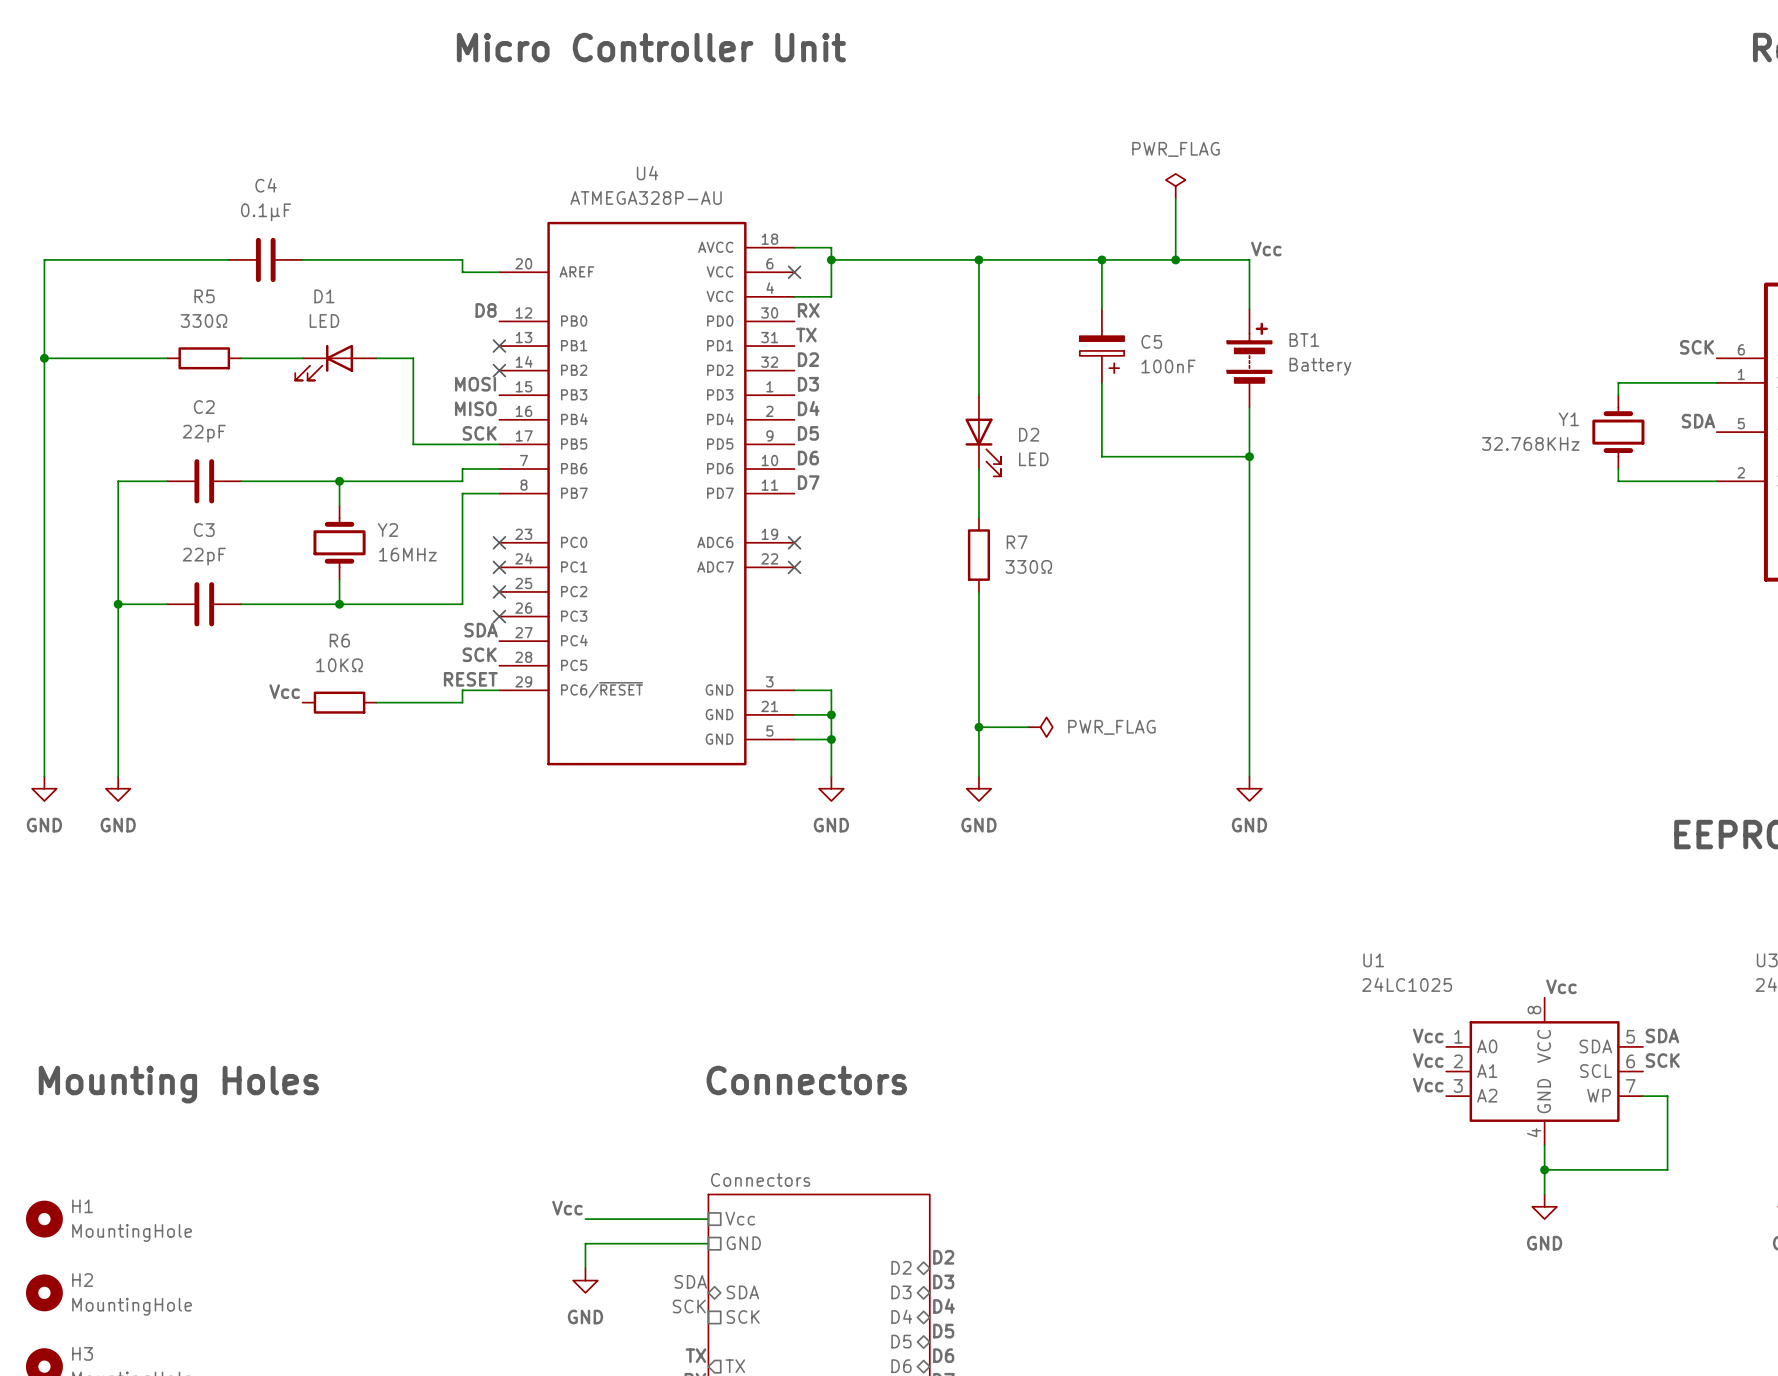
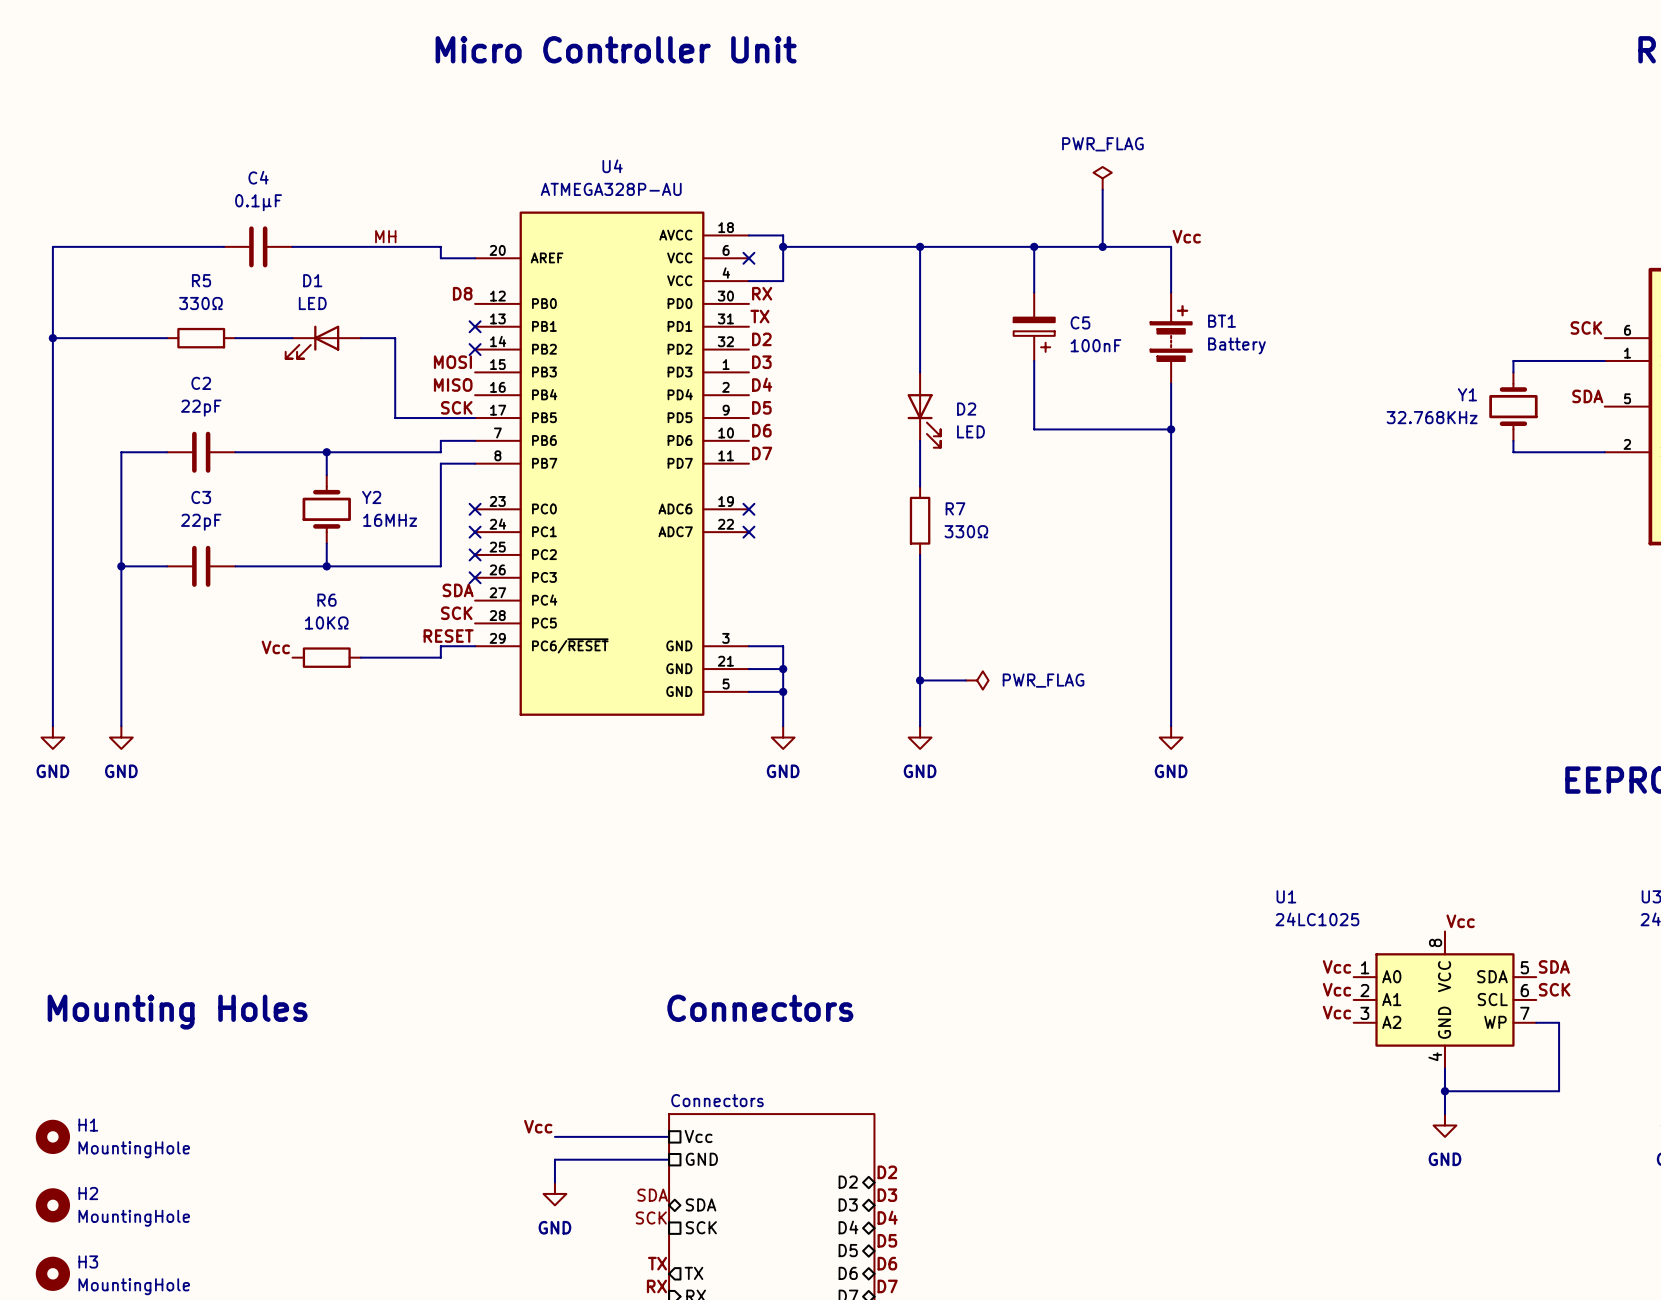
label: none -> MH (385, 236)

